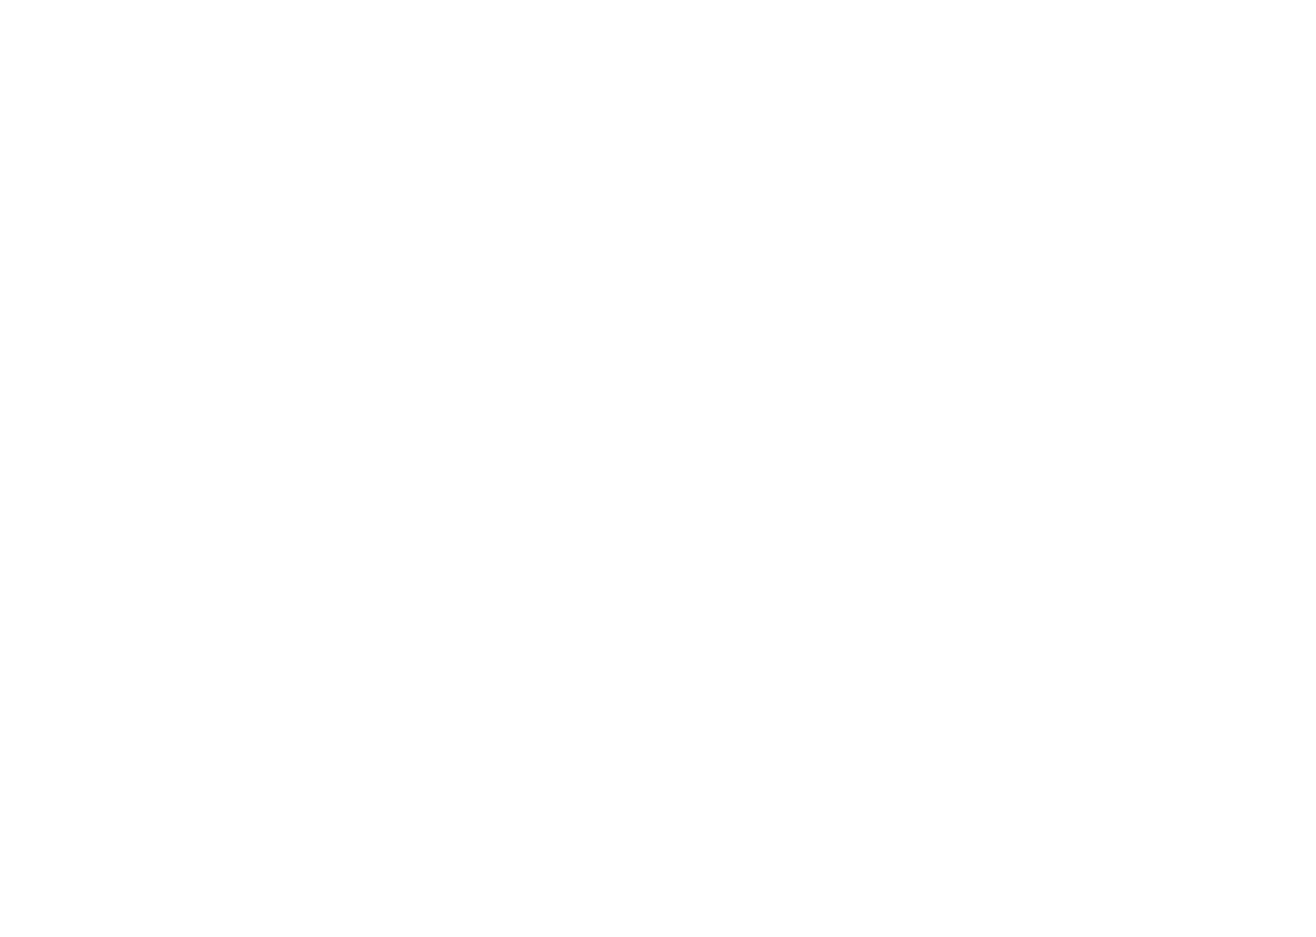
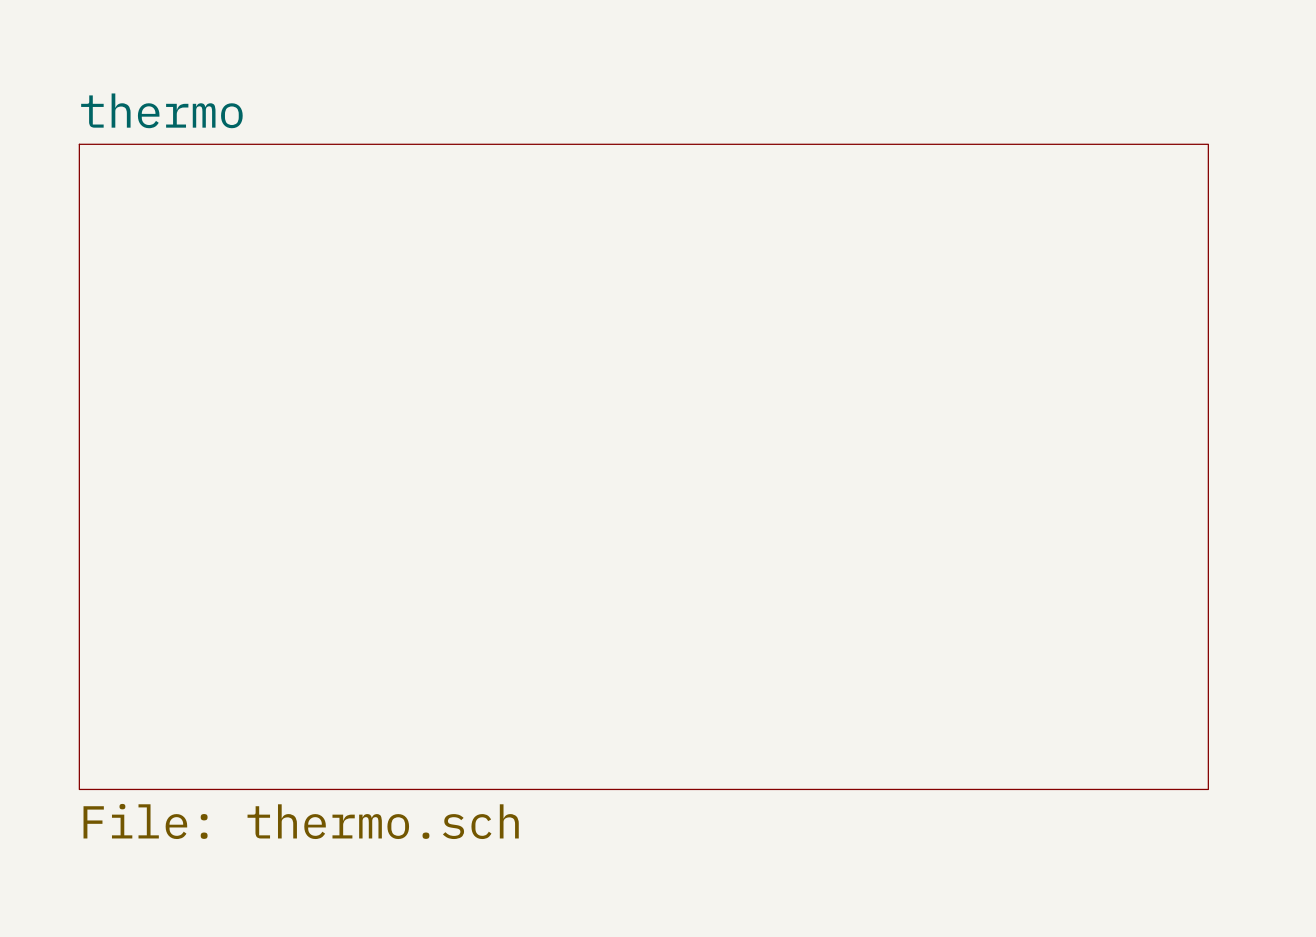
sheet thermo: none -> File: thermo.sch (643, 466)

